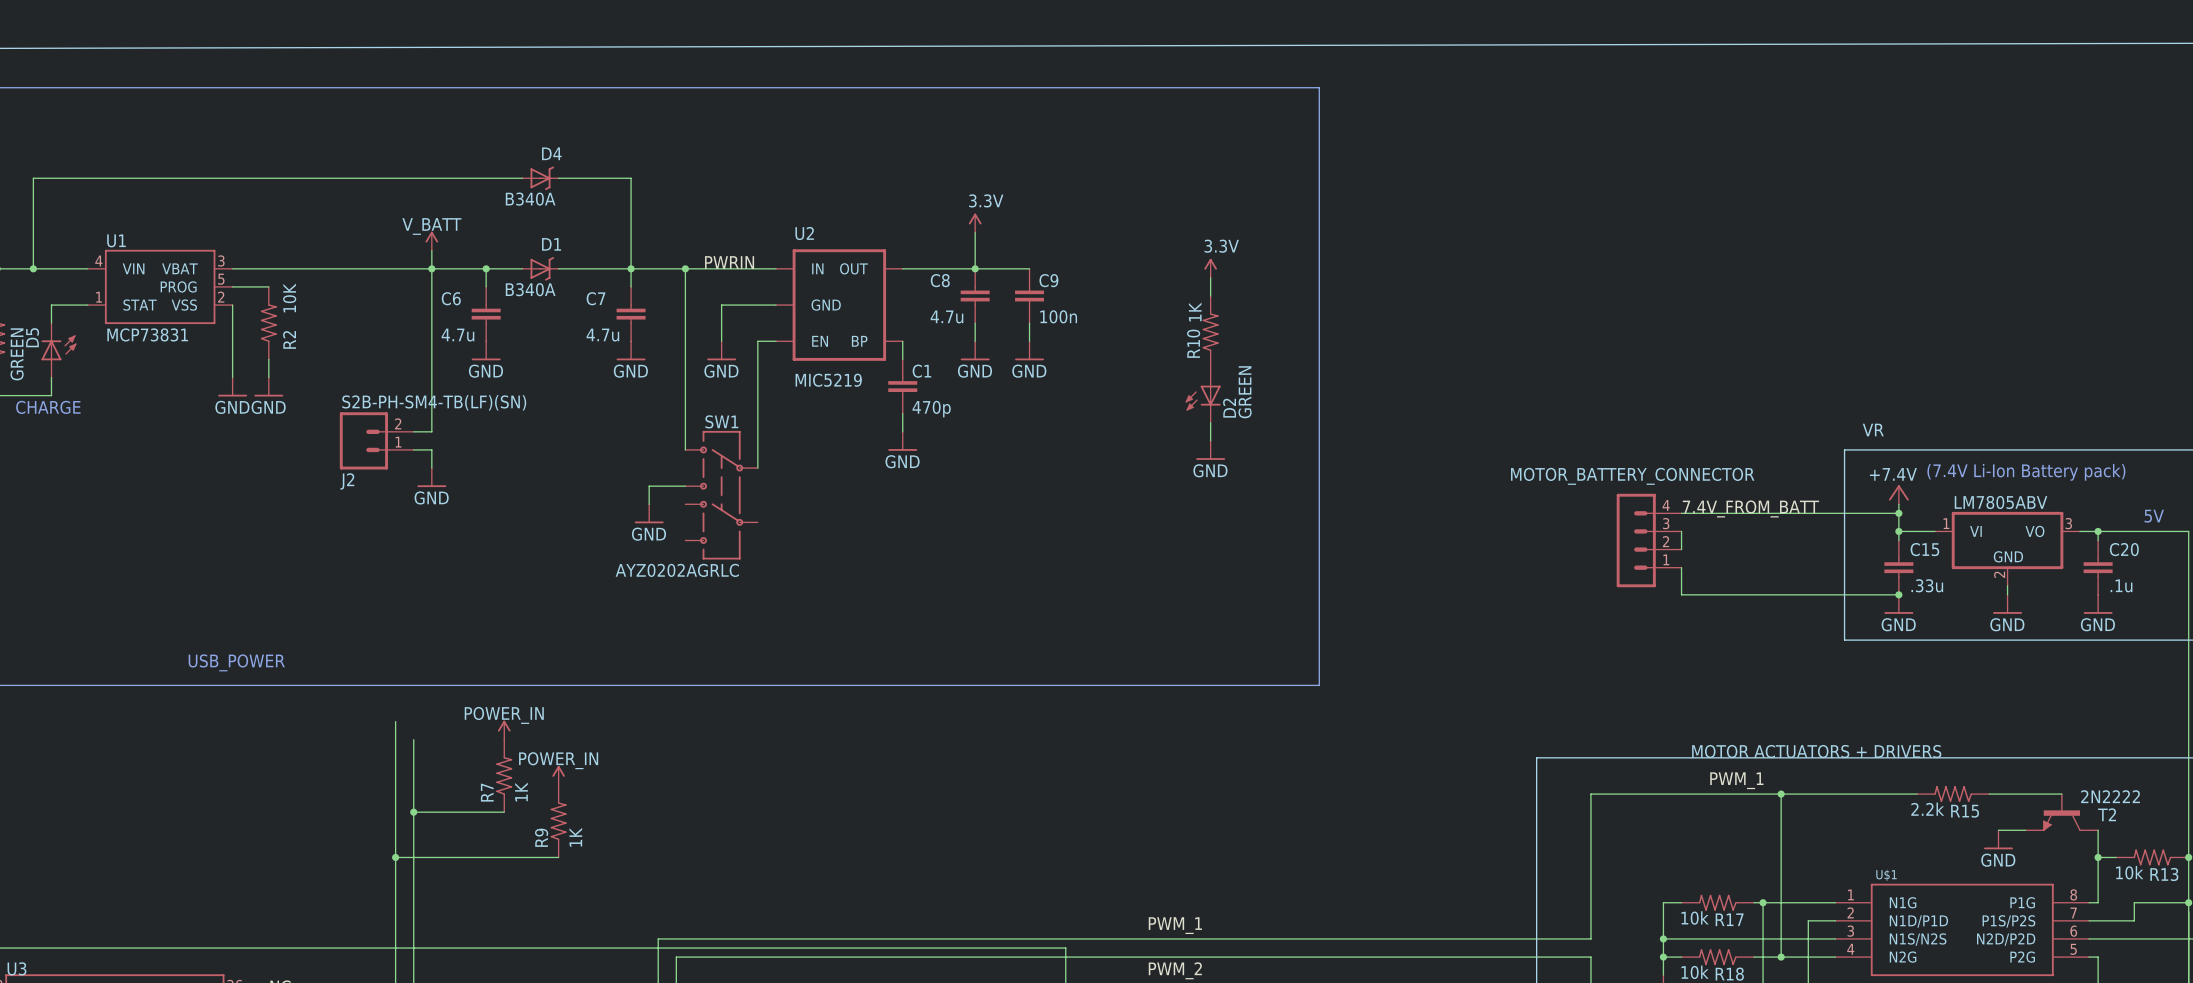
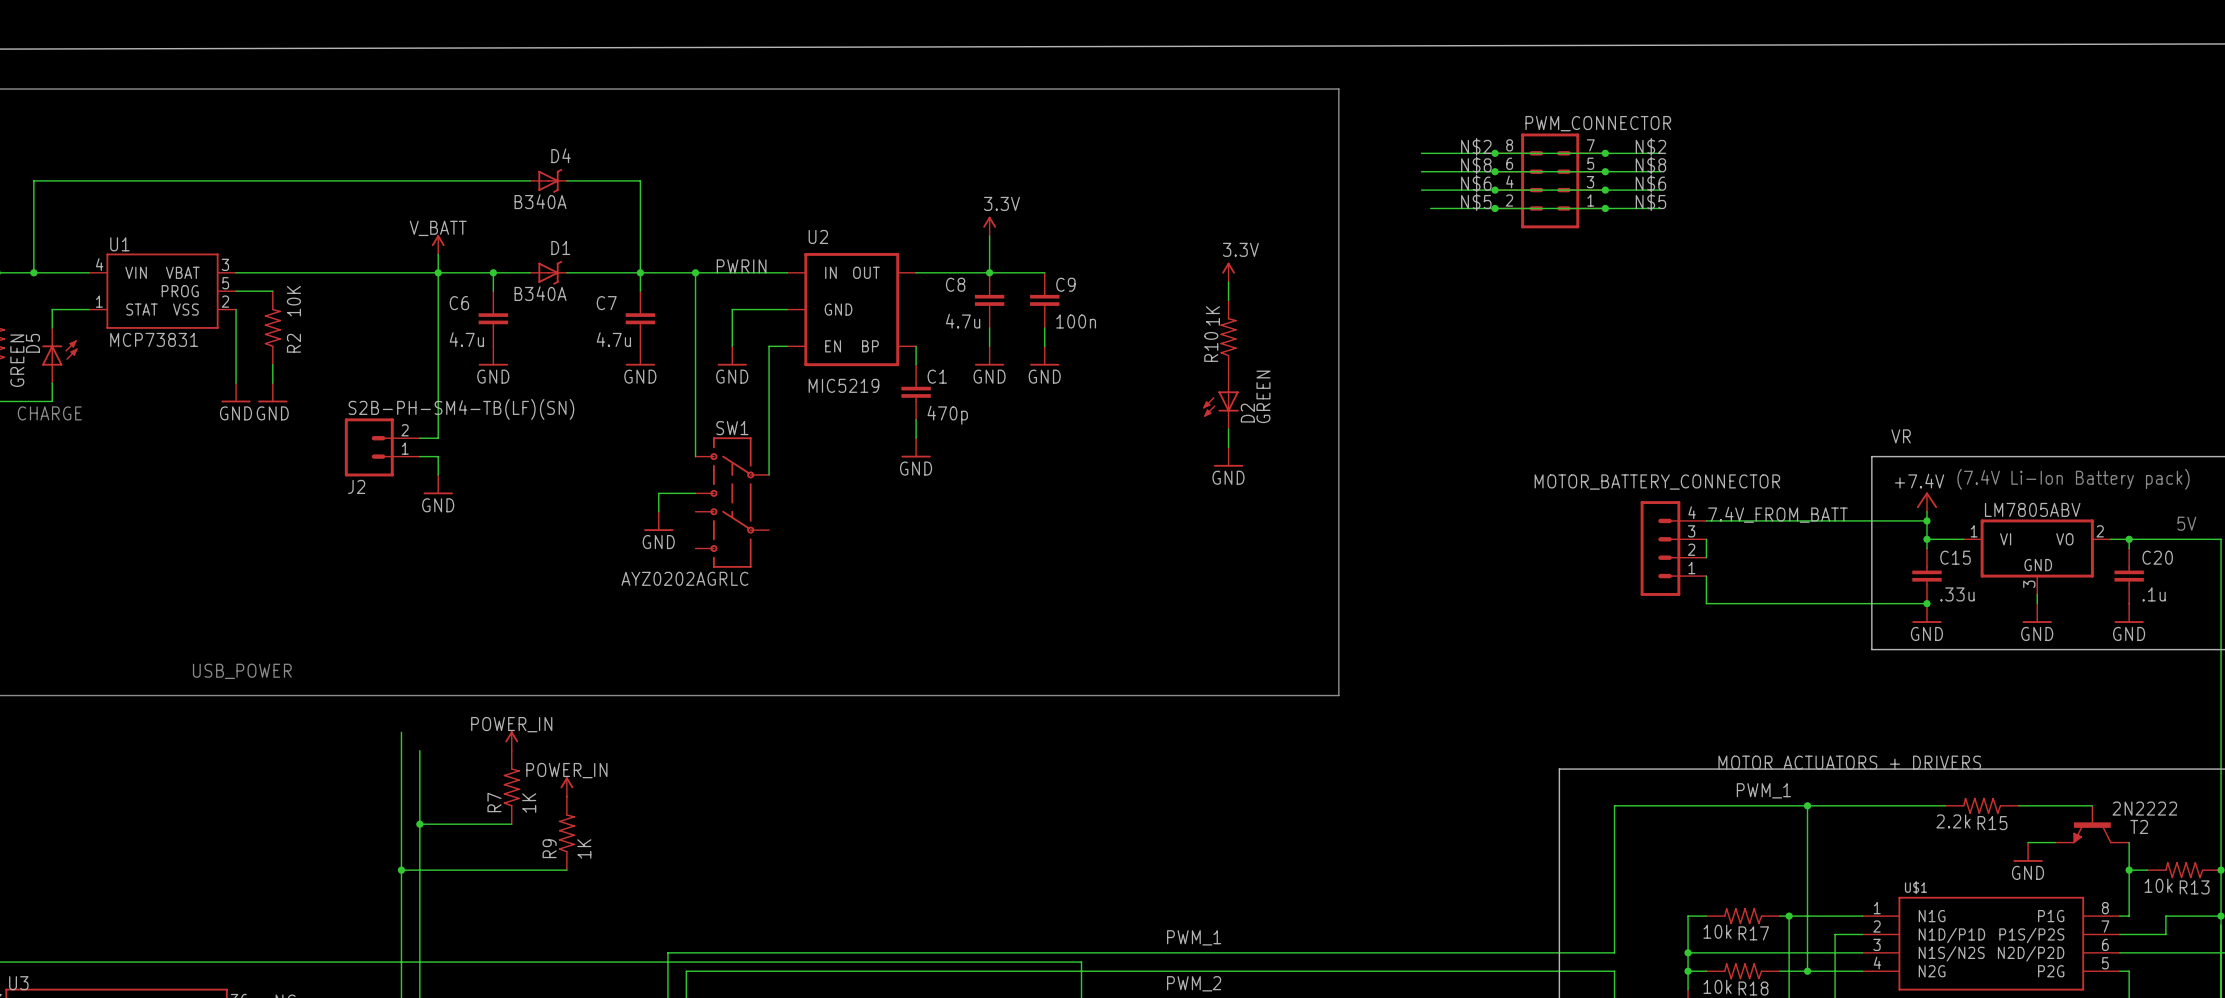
label: none -> N$2 (1476, 146)
label: none -> N$2 (1650, 146)
wire: none -> (1421, 153) (1660, 153)
junction: none -> (1495, 153)
junction: none -> (1605, 153)
label: none -> N$8 (1476, 165)
label: none -> N$8 (1650, 165)
wire: none -> (1421, 171) (1660, 171)
junction: none -> (1495, 171)
junction: none -> (1605, 171)
PWM_CONNECTOR: none -> (1550, 180)
label: none -> N$6 (1476, 183)
label: none -> N$6 (1650, 183)
wire: none -> (1421, 190) (1660, 190)
junction: none -> (1495, 190)
junction: none -> (1605, 190)
label: none -> N$5 (1476, 202)
label: none -> N$5 (1650, 202)
wire: none -> (1430, 208) (1660, 208)
junction: none -> (1495, 208)
junction: none -> (1605, 208)
VR pin number: 3 (2068, 523) -> 2 (2100, 531)
VR pin number: 2 (1999, 574) -> 3 (2029, 584)

